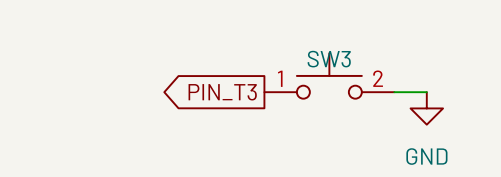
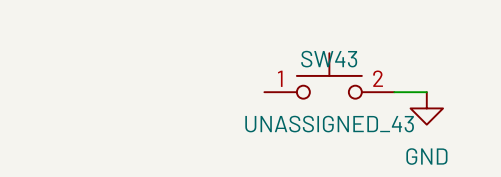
SW3 name: SW3 (329, 59) -> SW43 (329, 59)
global label: PIN_T3 (222, 92) -> none
SW3 value: none -> UNASSIGNED_43 (329, 124)

